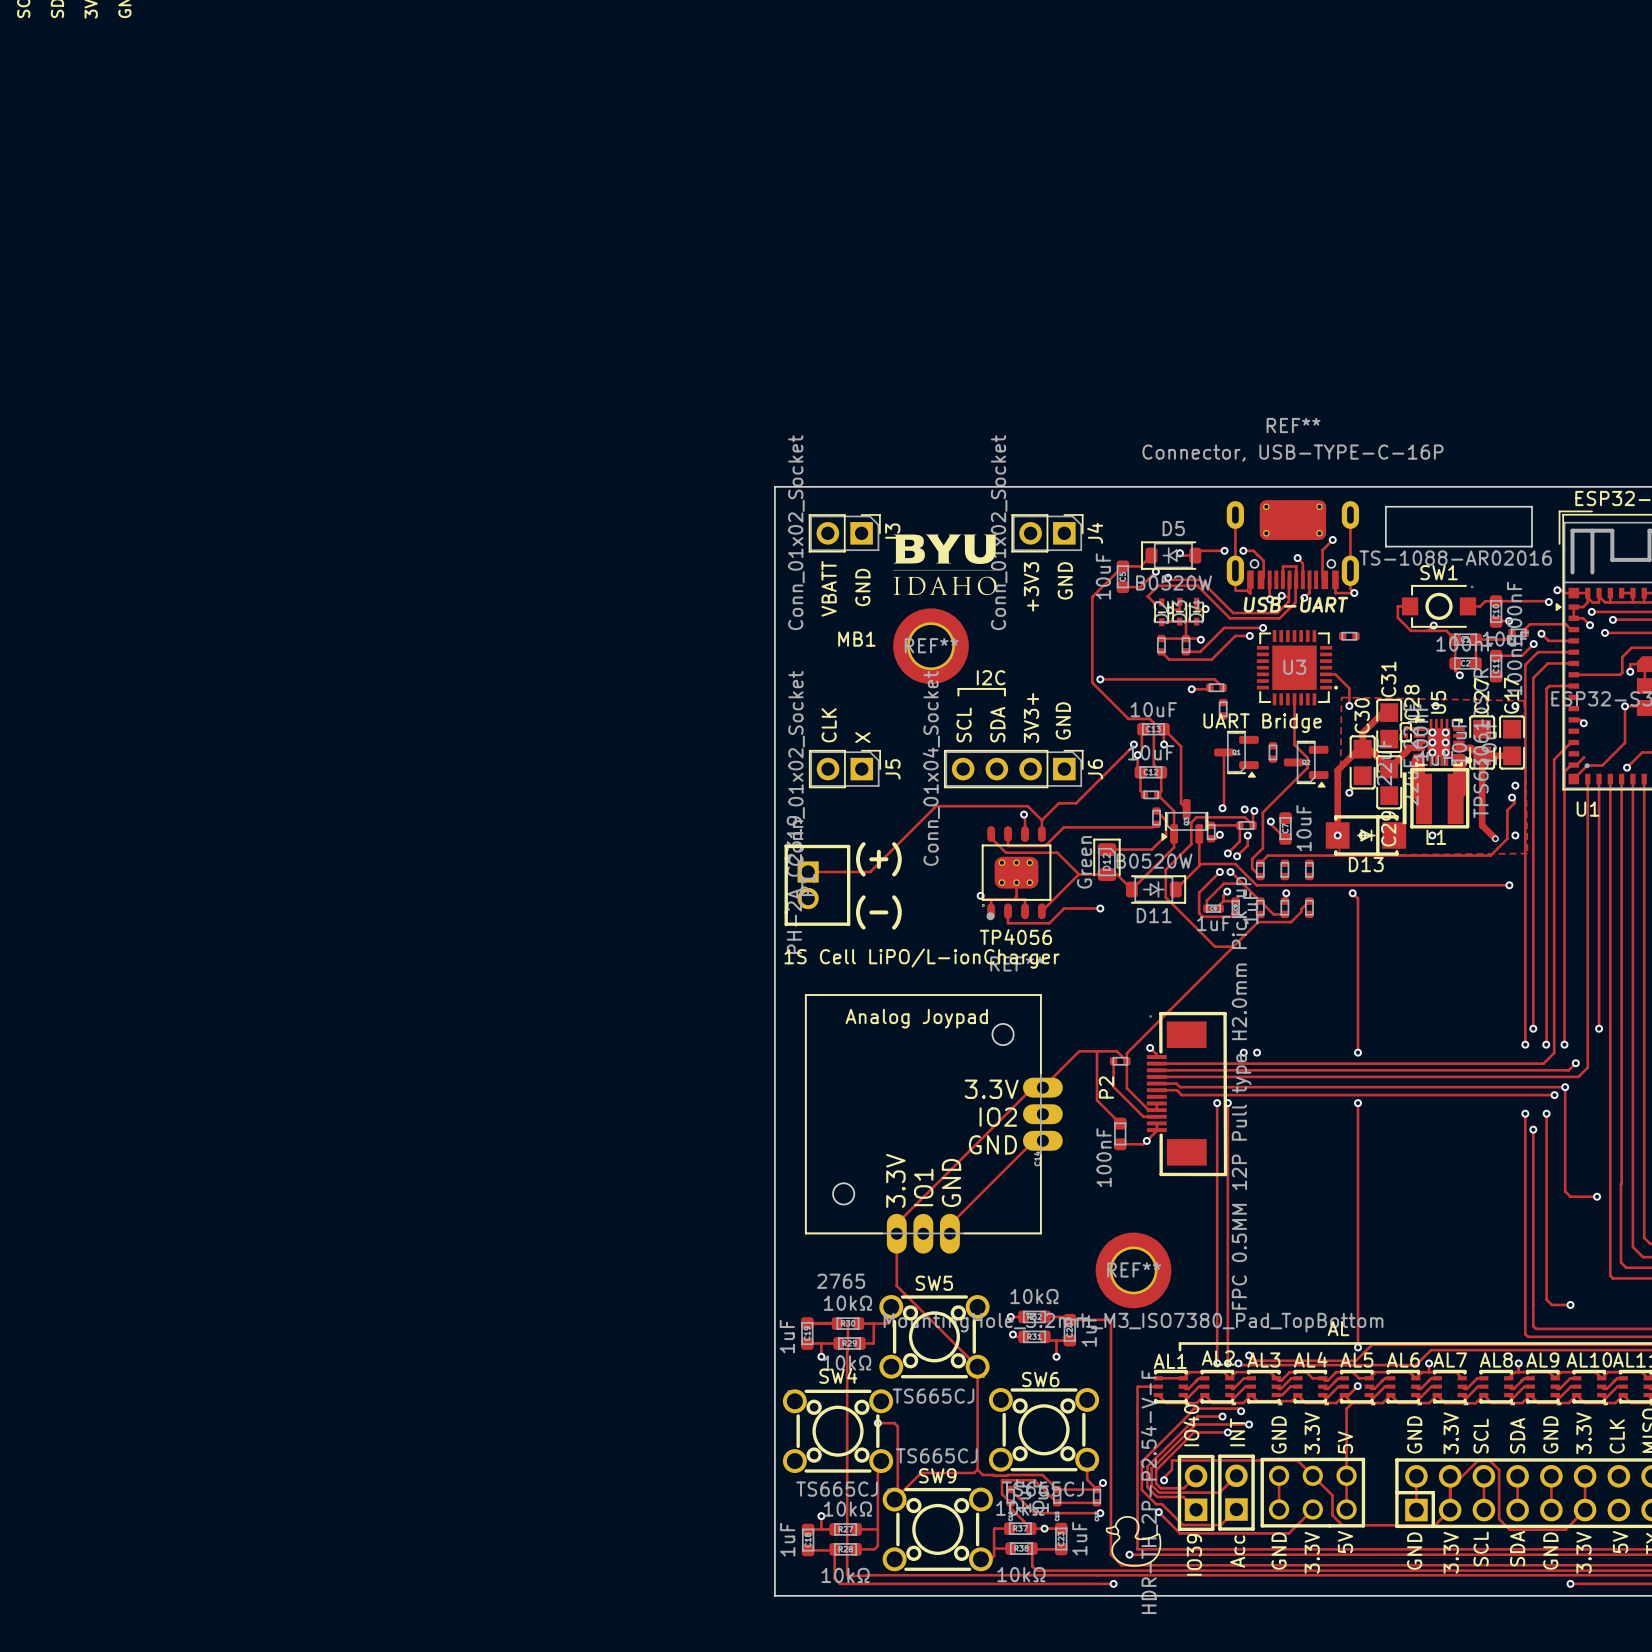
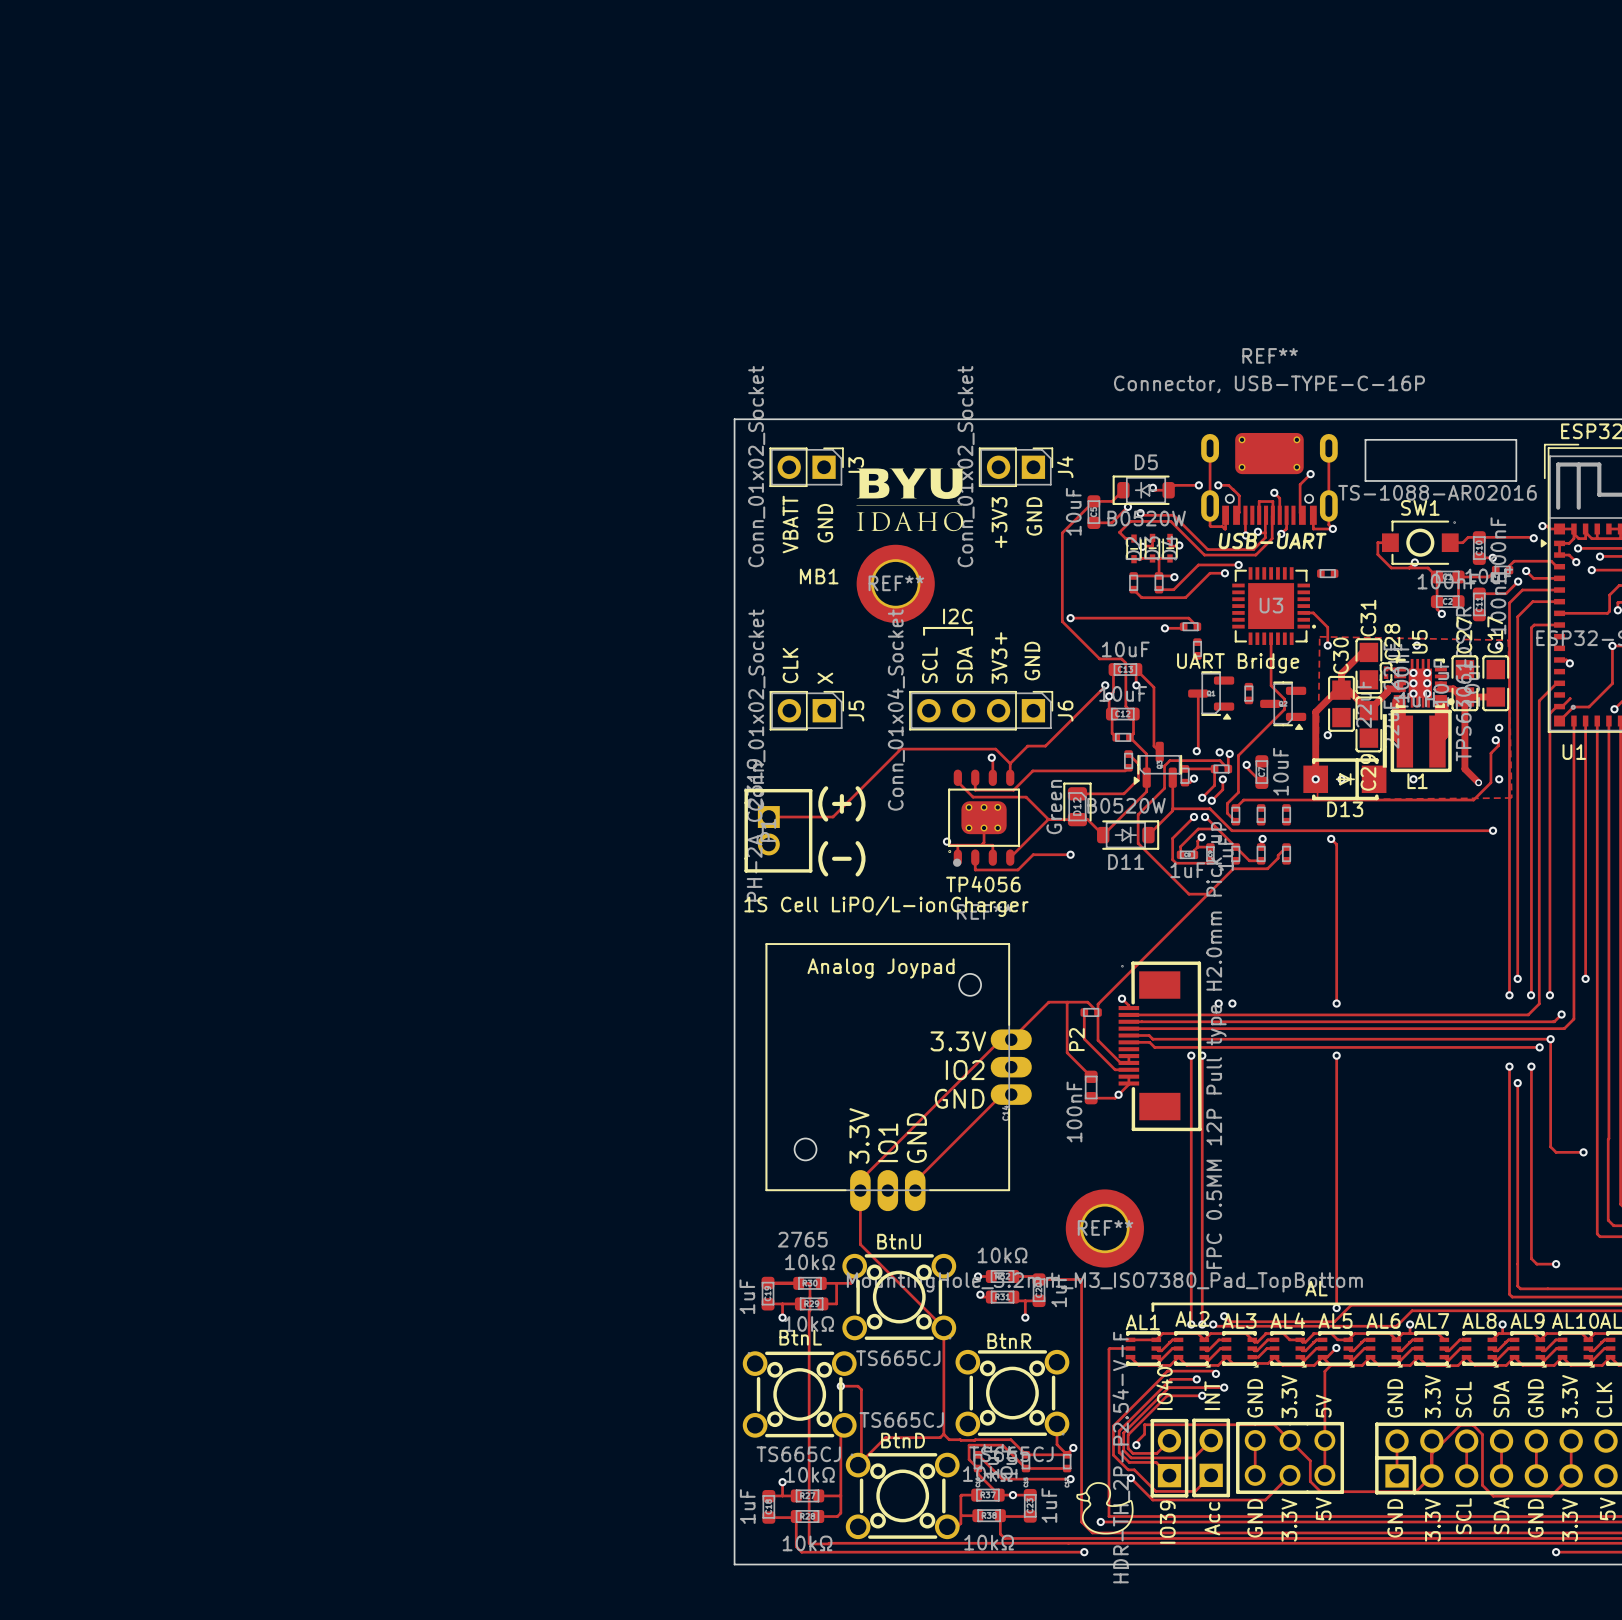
SW5 name: SW5 (934, 1283) -> BtnU (899, 1241)
SW4 name: SW4 (838, 1375) -> BtnL (800, 1337)
SW6 name: SW6 (1040, 1379) -> BtnR (1009, 1341)
SW9 name: SW9 (937, 1475) -> BtnD (903, 1440)

